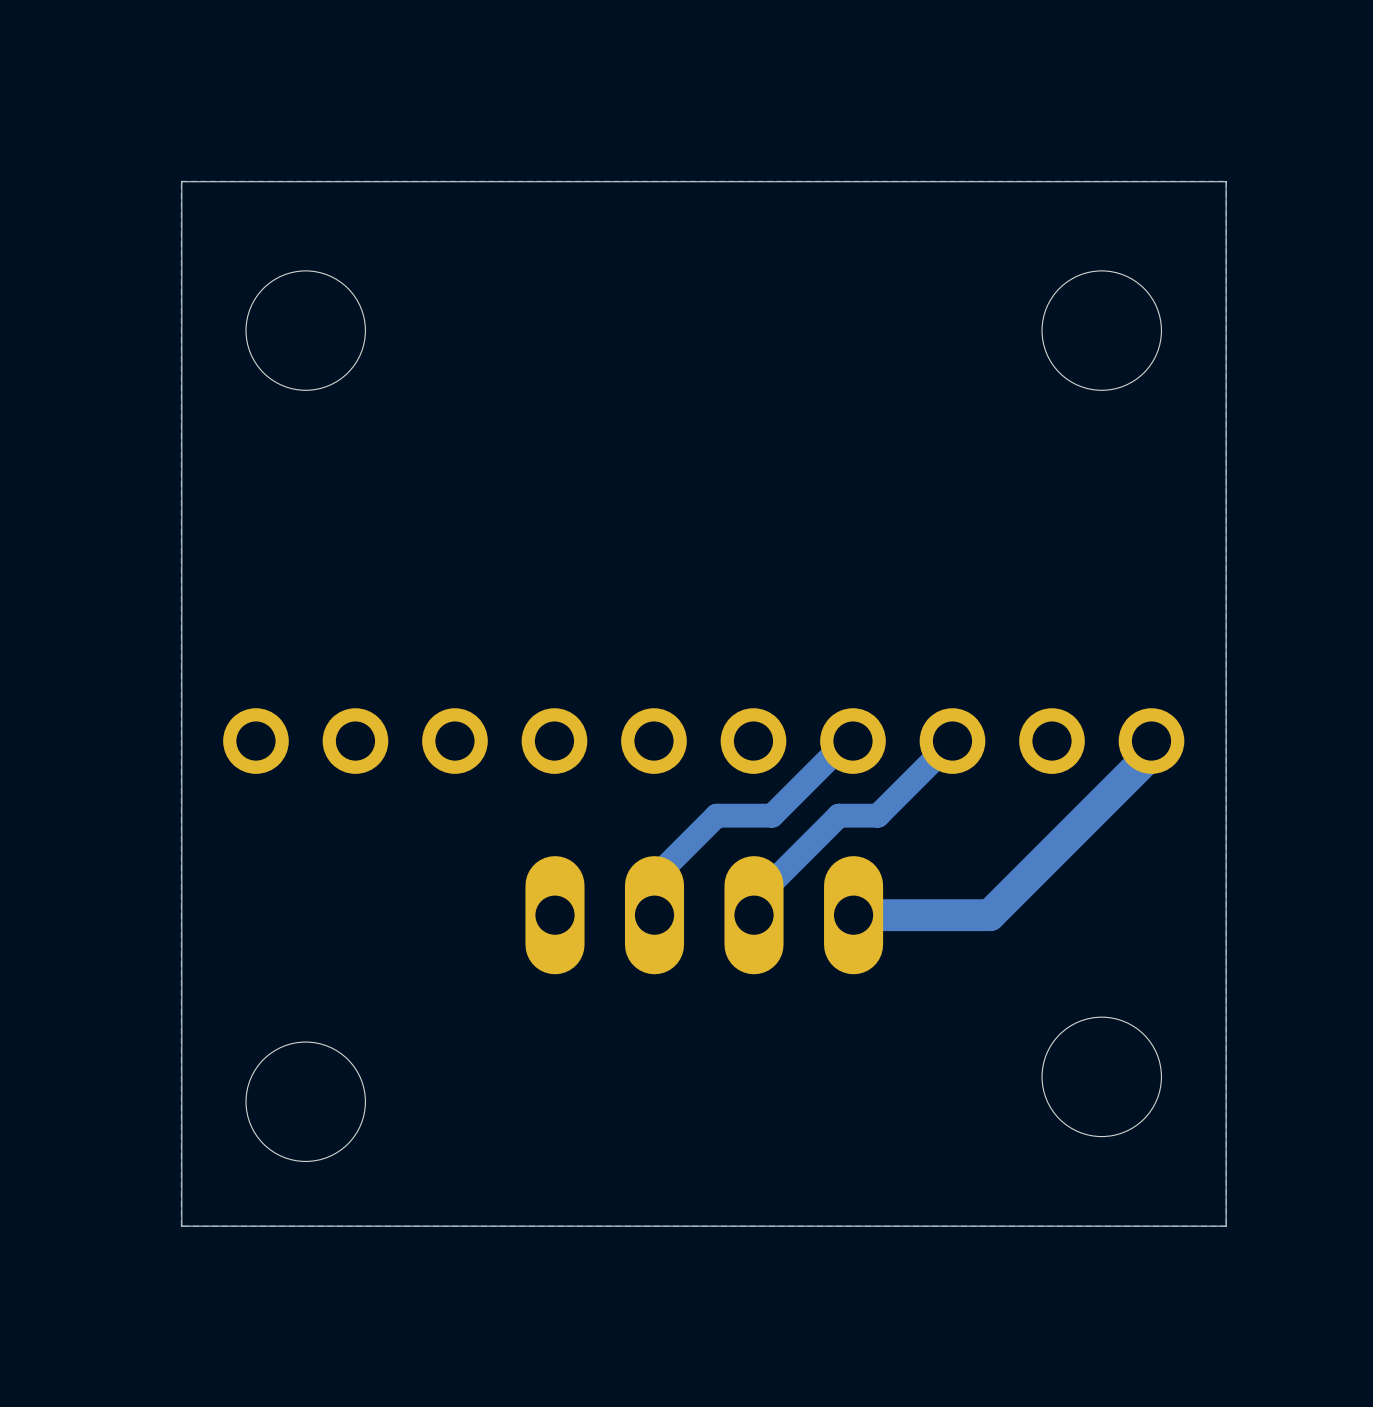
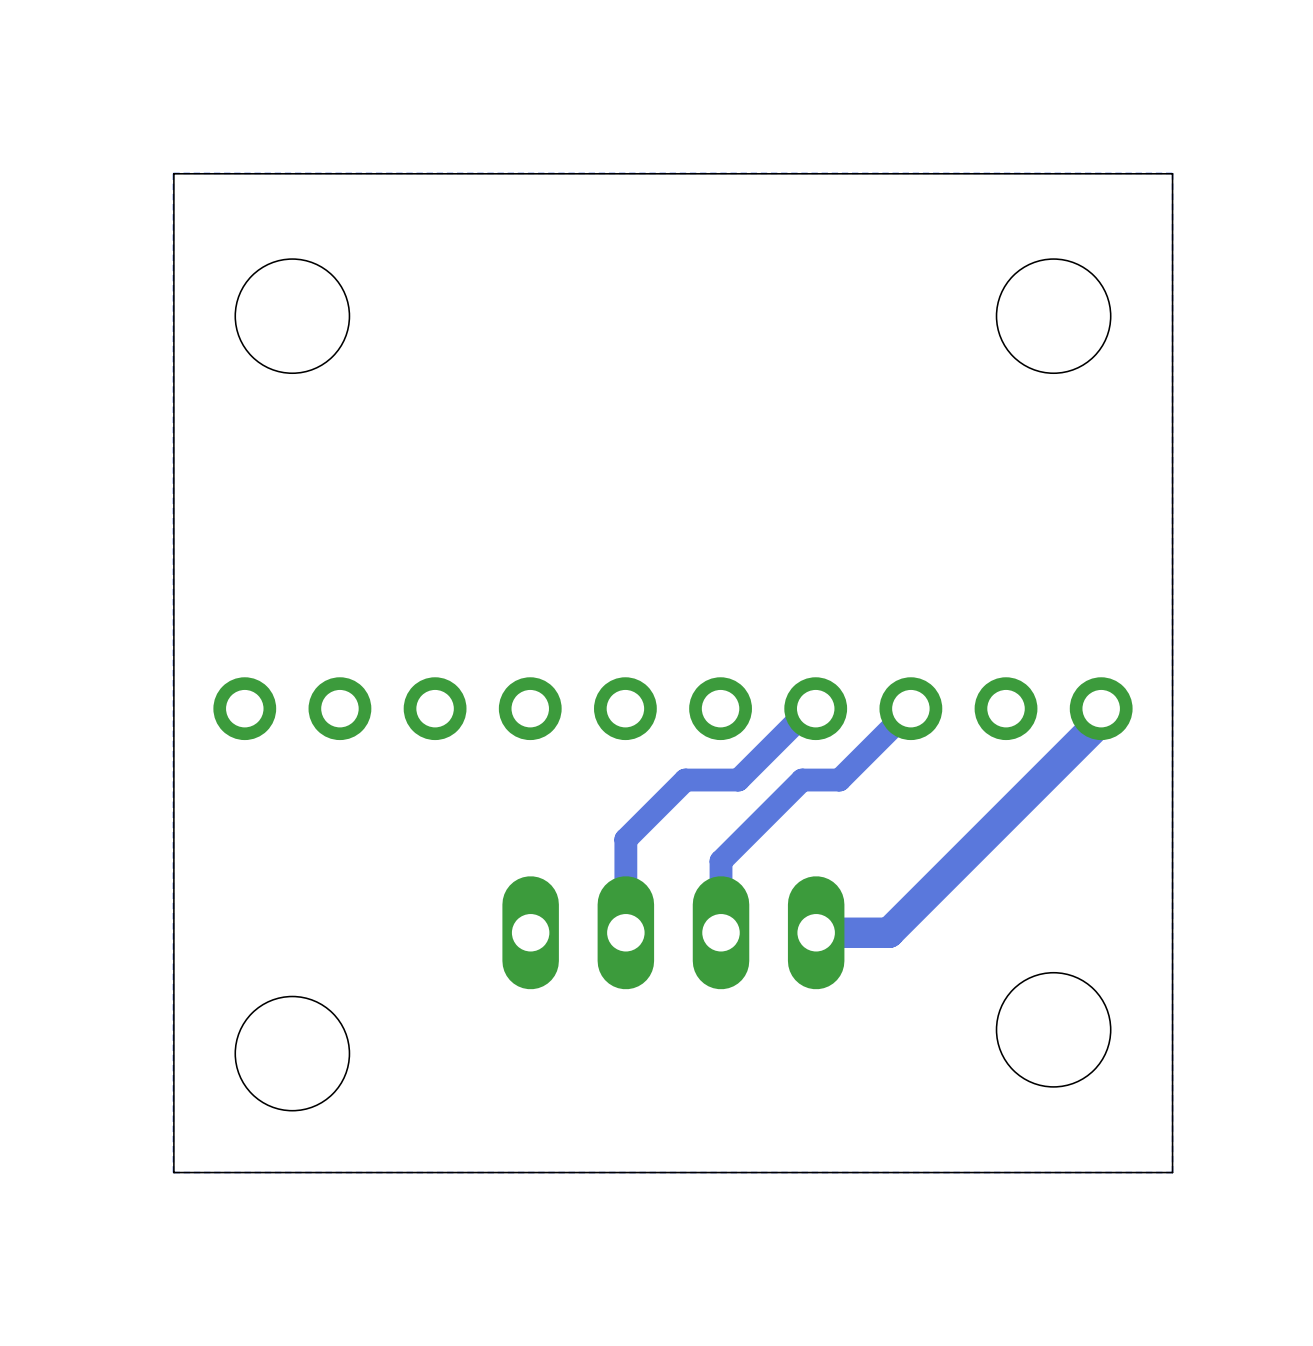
part position: (704, 915) -> (673, 932)
track: (989, 915) (853, 915) -> (946, 875) (888, 932) (816, 932)

